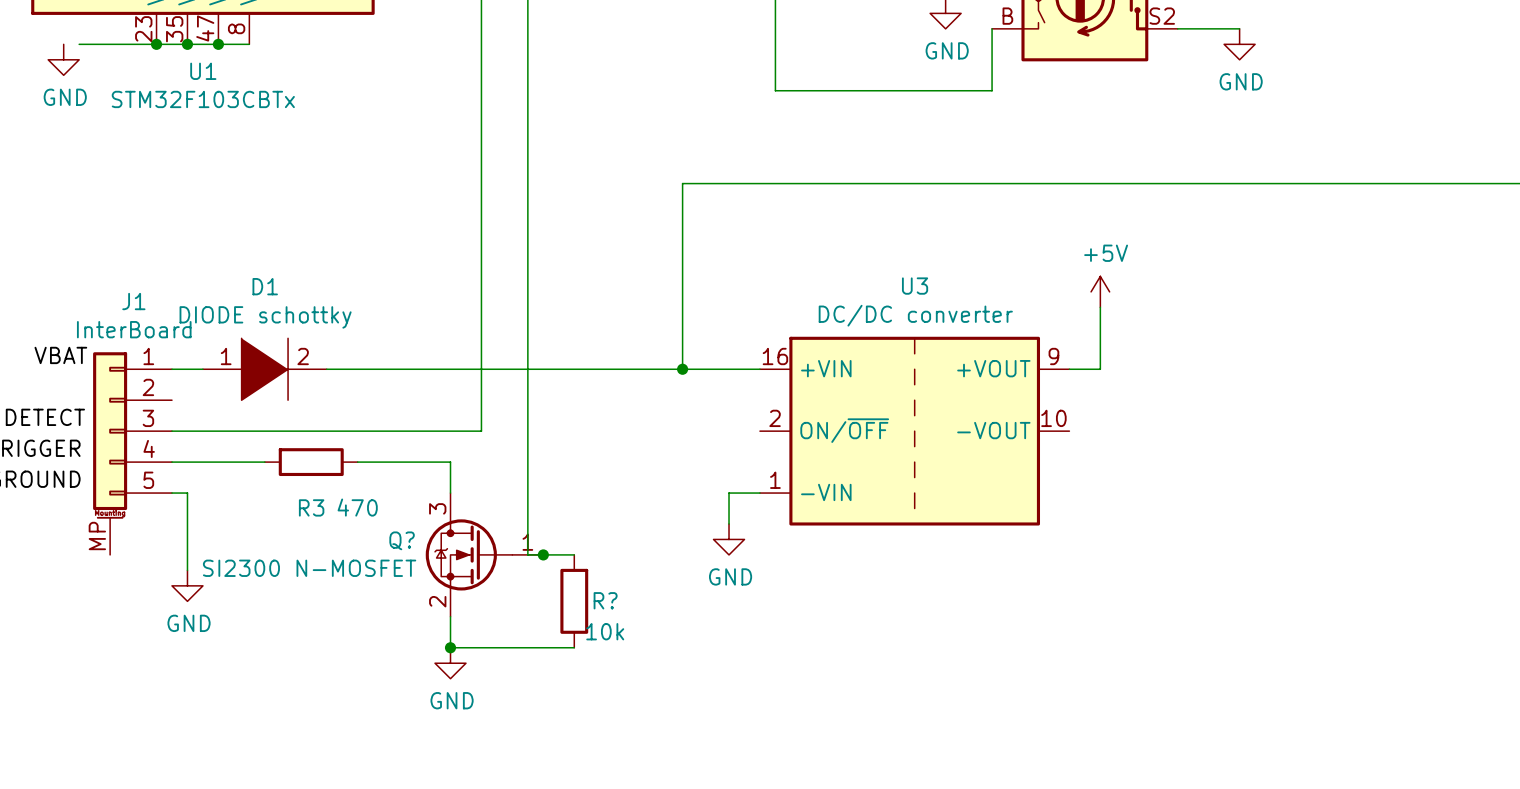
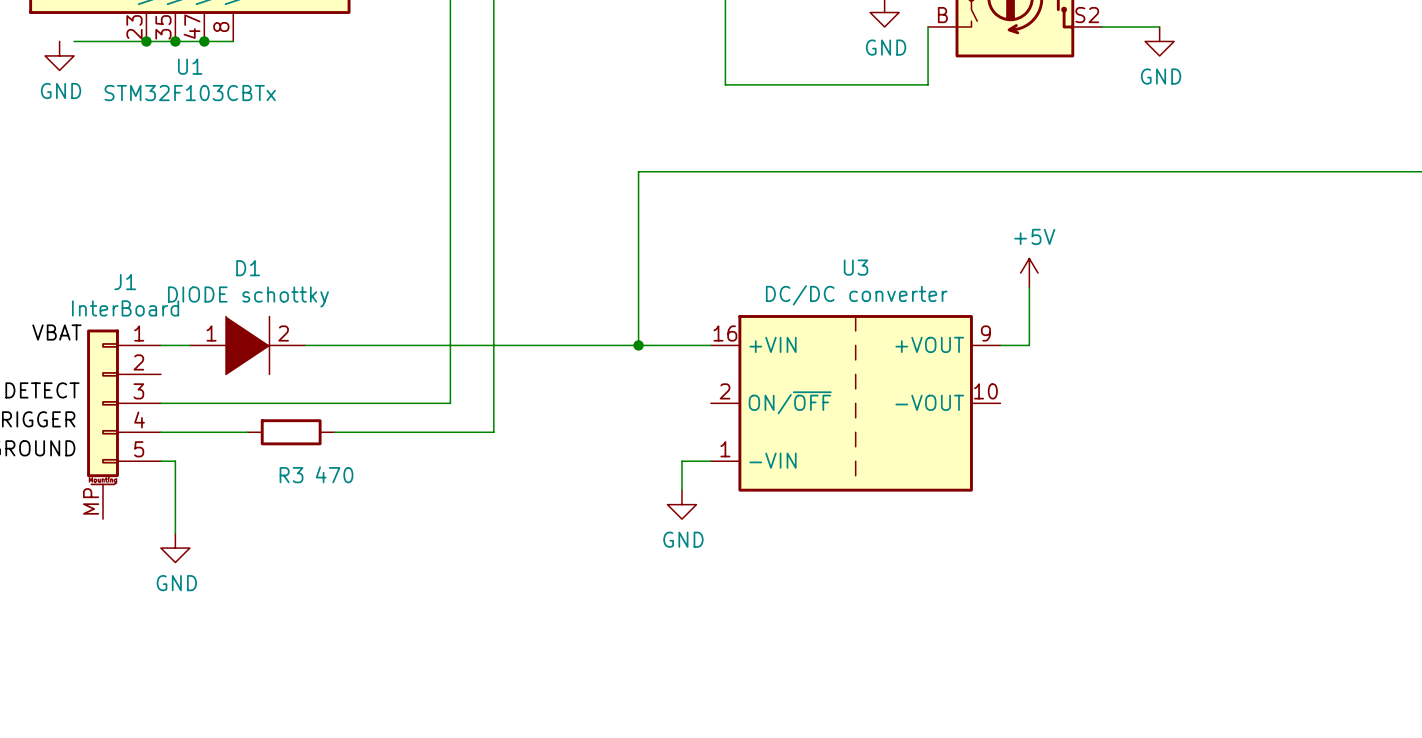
wire: (450, 462) (450, 493) -> (421, 432) (493, 432)
wire: (527, 462) (527, 554) (574, 554) -> none
Q?: SI2300 N-MOSFET (484, 554) -> none
junction: (543, 554) -> none
R?: 10k (574, 601) -> none
wire: (450, 616) (450, 647) (574, 647) -> none
junction: (450, 647) -> none
power symbol: GND (450, 663) -> none

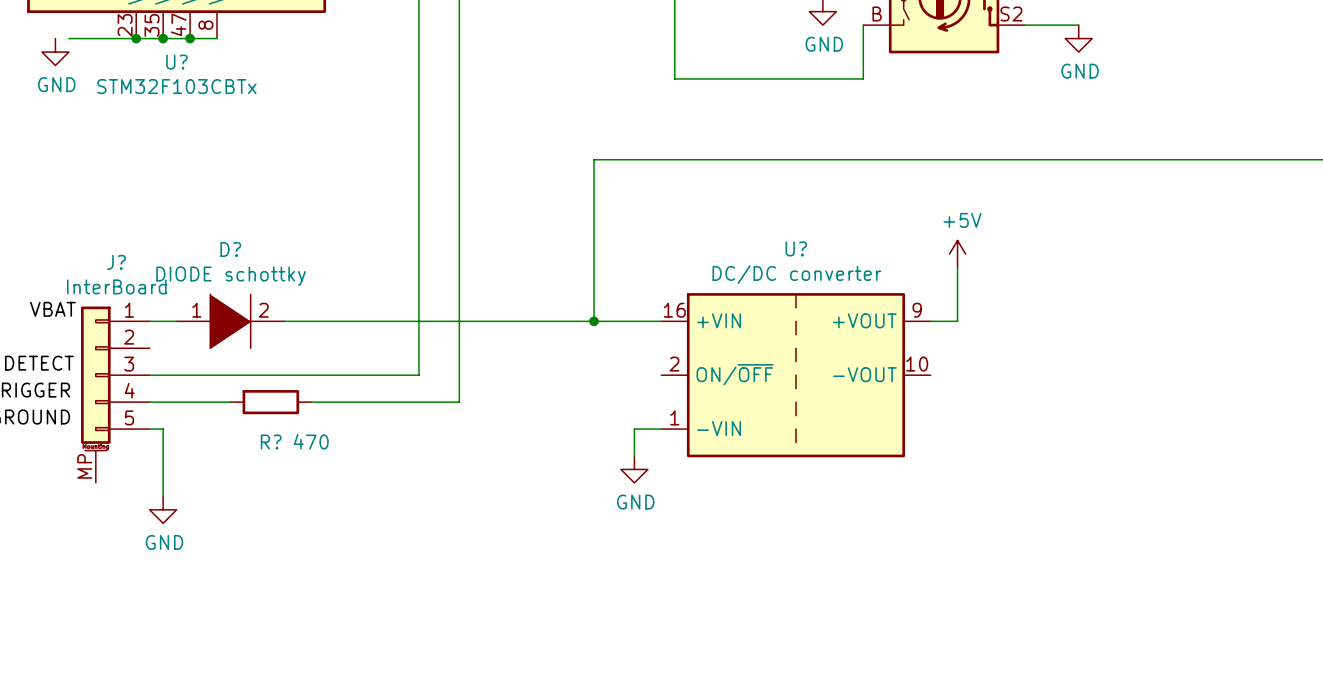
U1 name: U1 (190, 66) -> U? (176, 62)
U3 name: U3 (856, 267) -> U? (796, 248)
D1 name: D1 (248, 268) -> D? (230, 249)
J1 name: J1 (125, 282) -> J? (116, 262)
R3 name: R3 (291, 475) -> R? (271, 442)

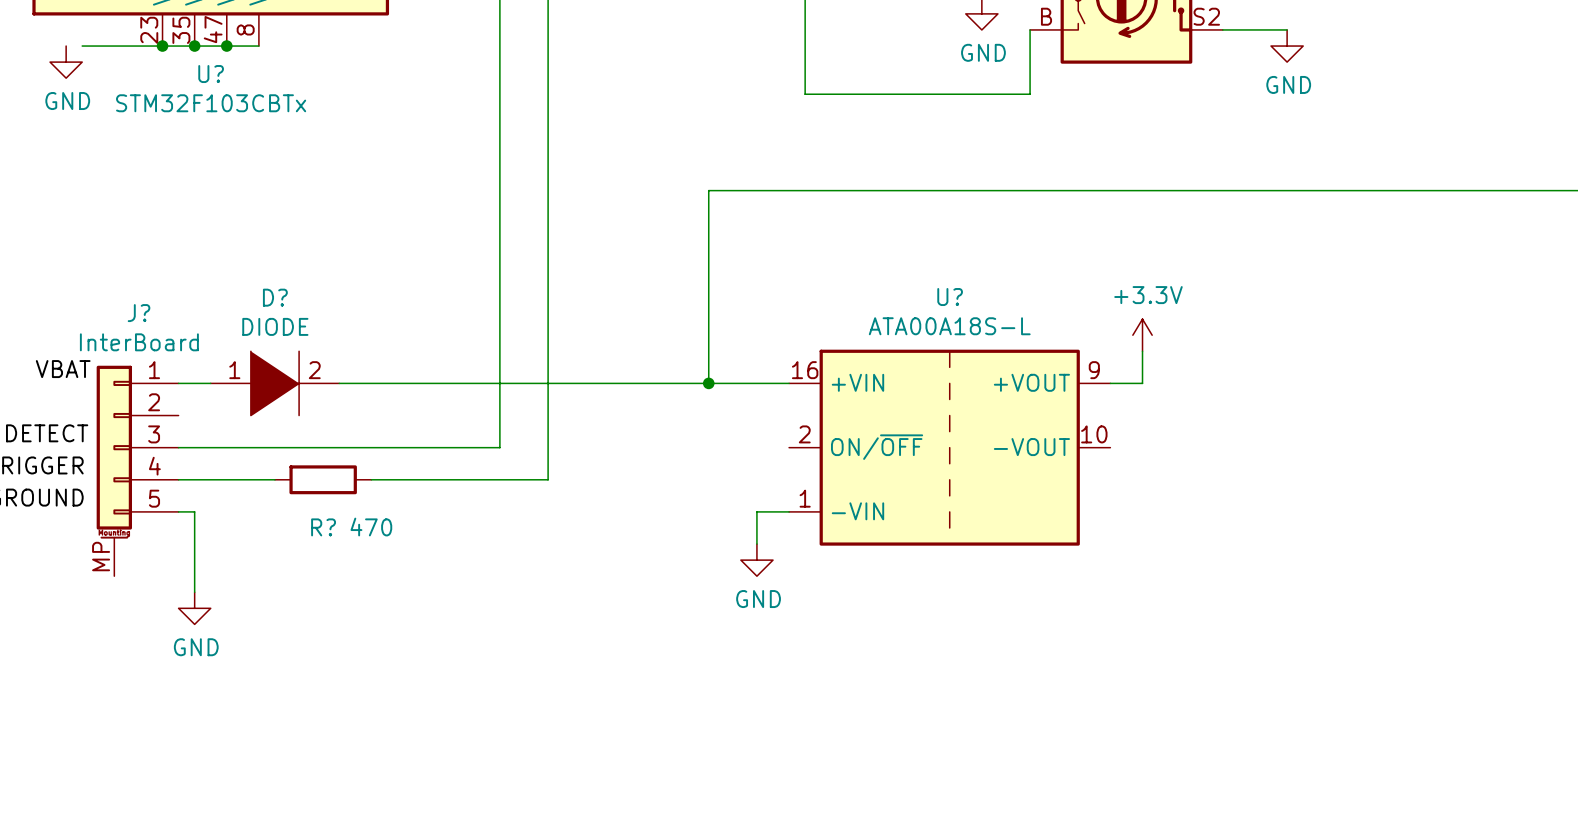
power symbol: +5V (957, 254) -> none
U? value: DC/DC converter (796, 274) -> ATA00A18S-L (949, 326)
D? value: DIODE schottky (231, 276) -> DIODE (275, 326)
power symbol: none -> +3.3V (1142, 335)

